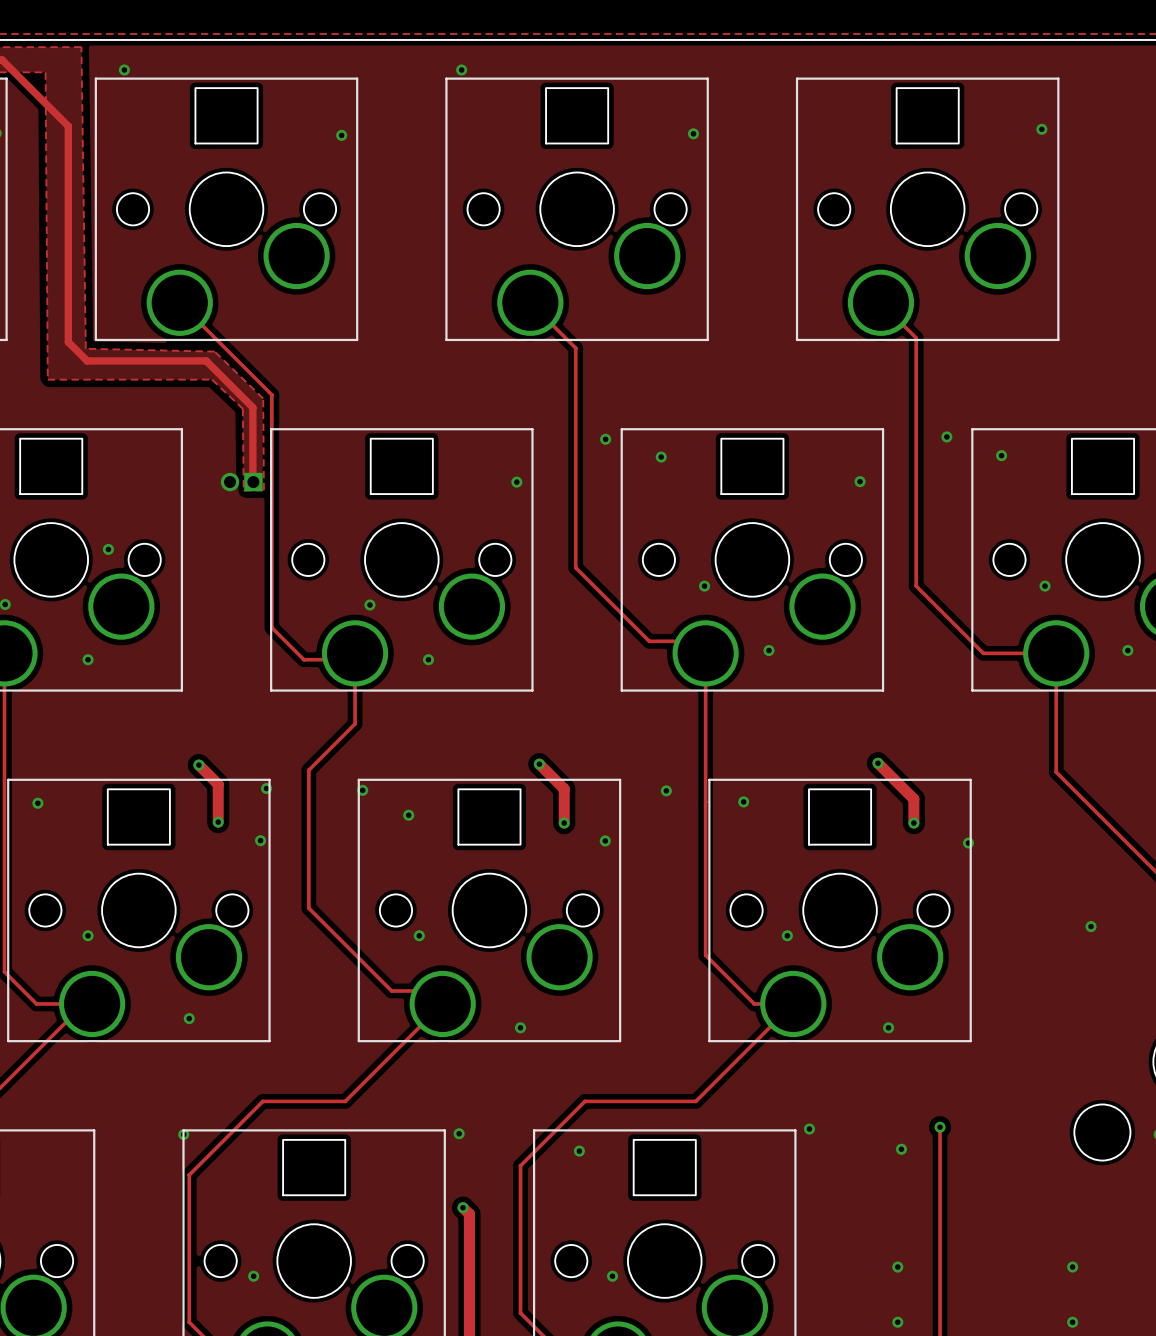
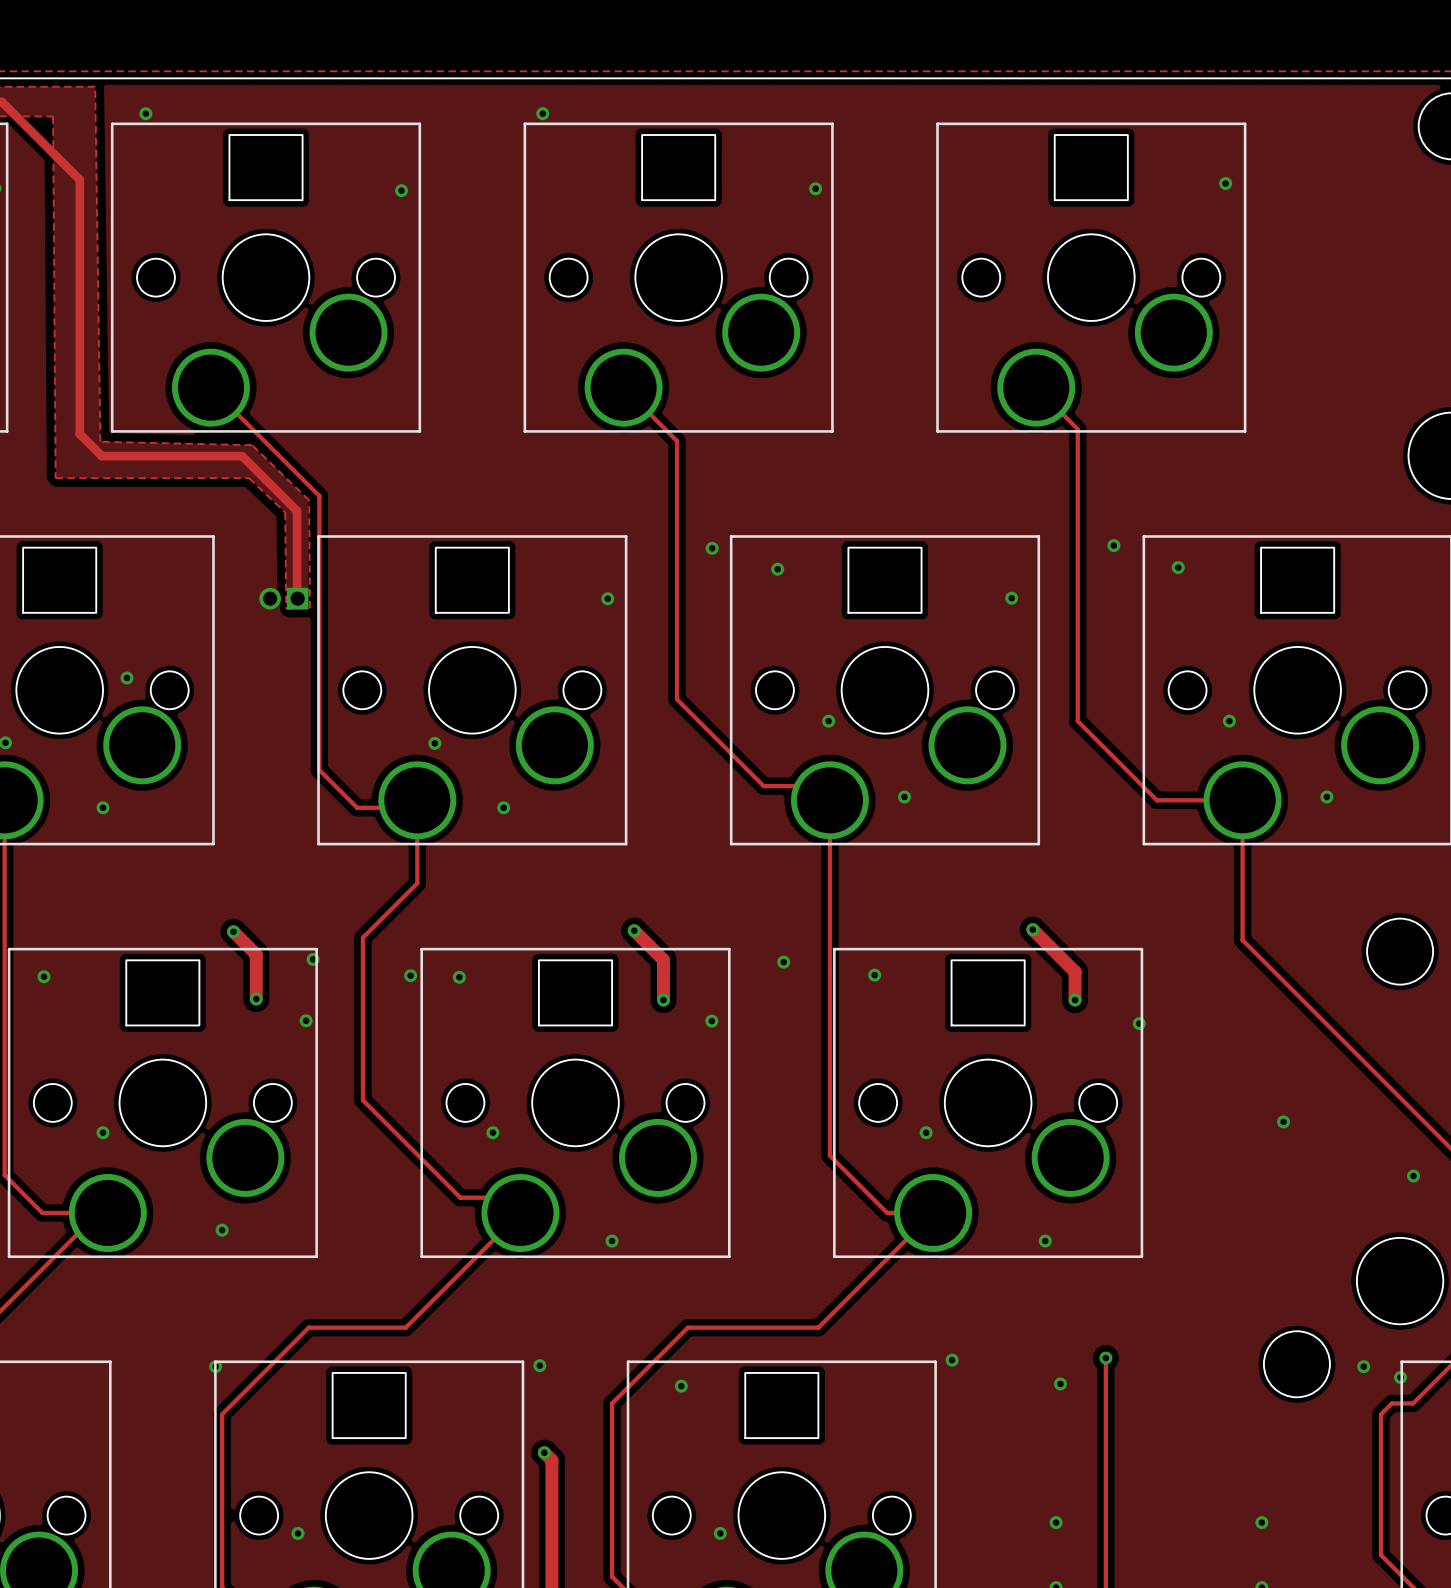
via: (362, 790) -> none
via: none -> (410, 975)
via: none -> (459, 977)
via: (408, 815) -> none

